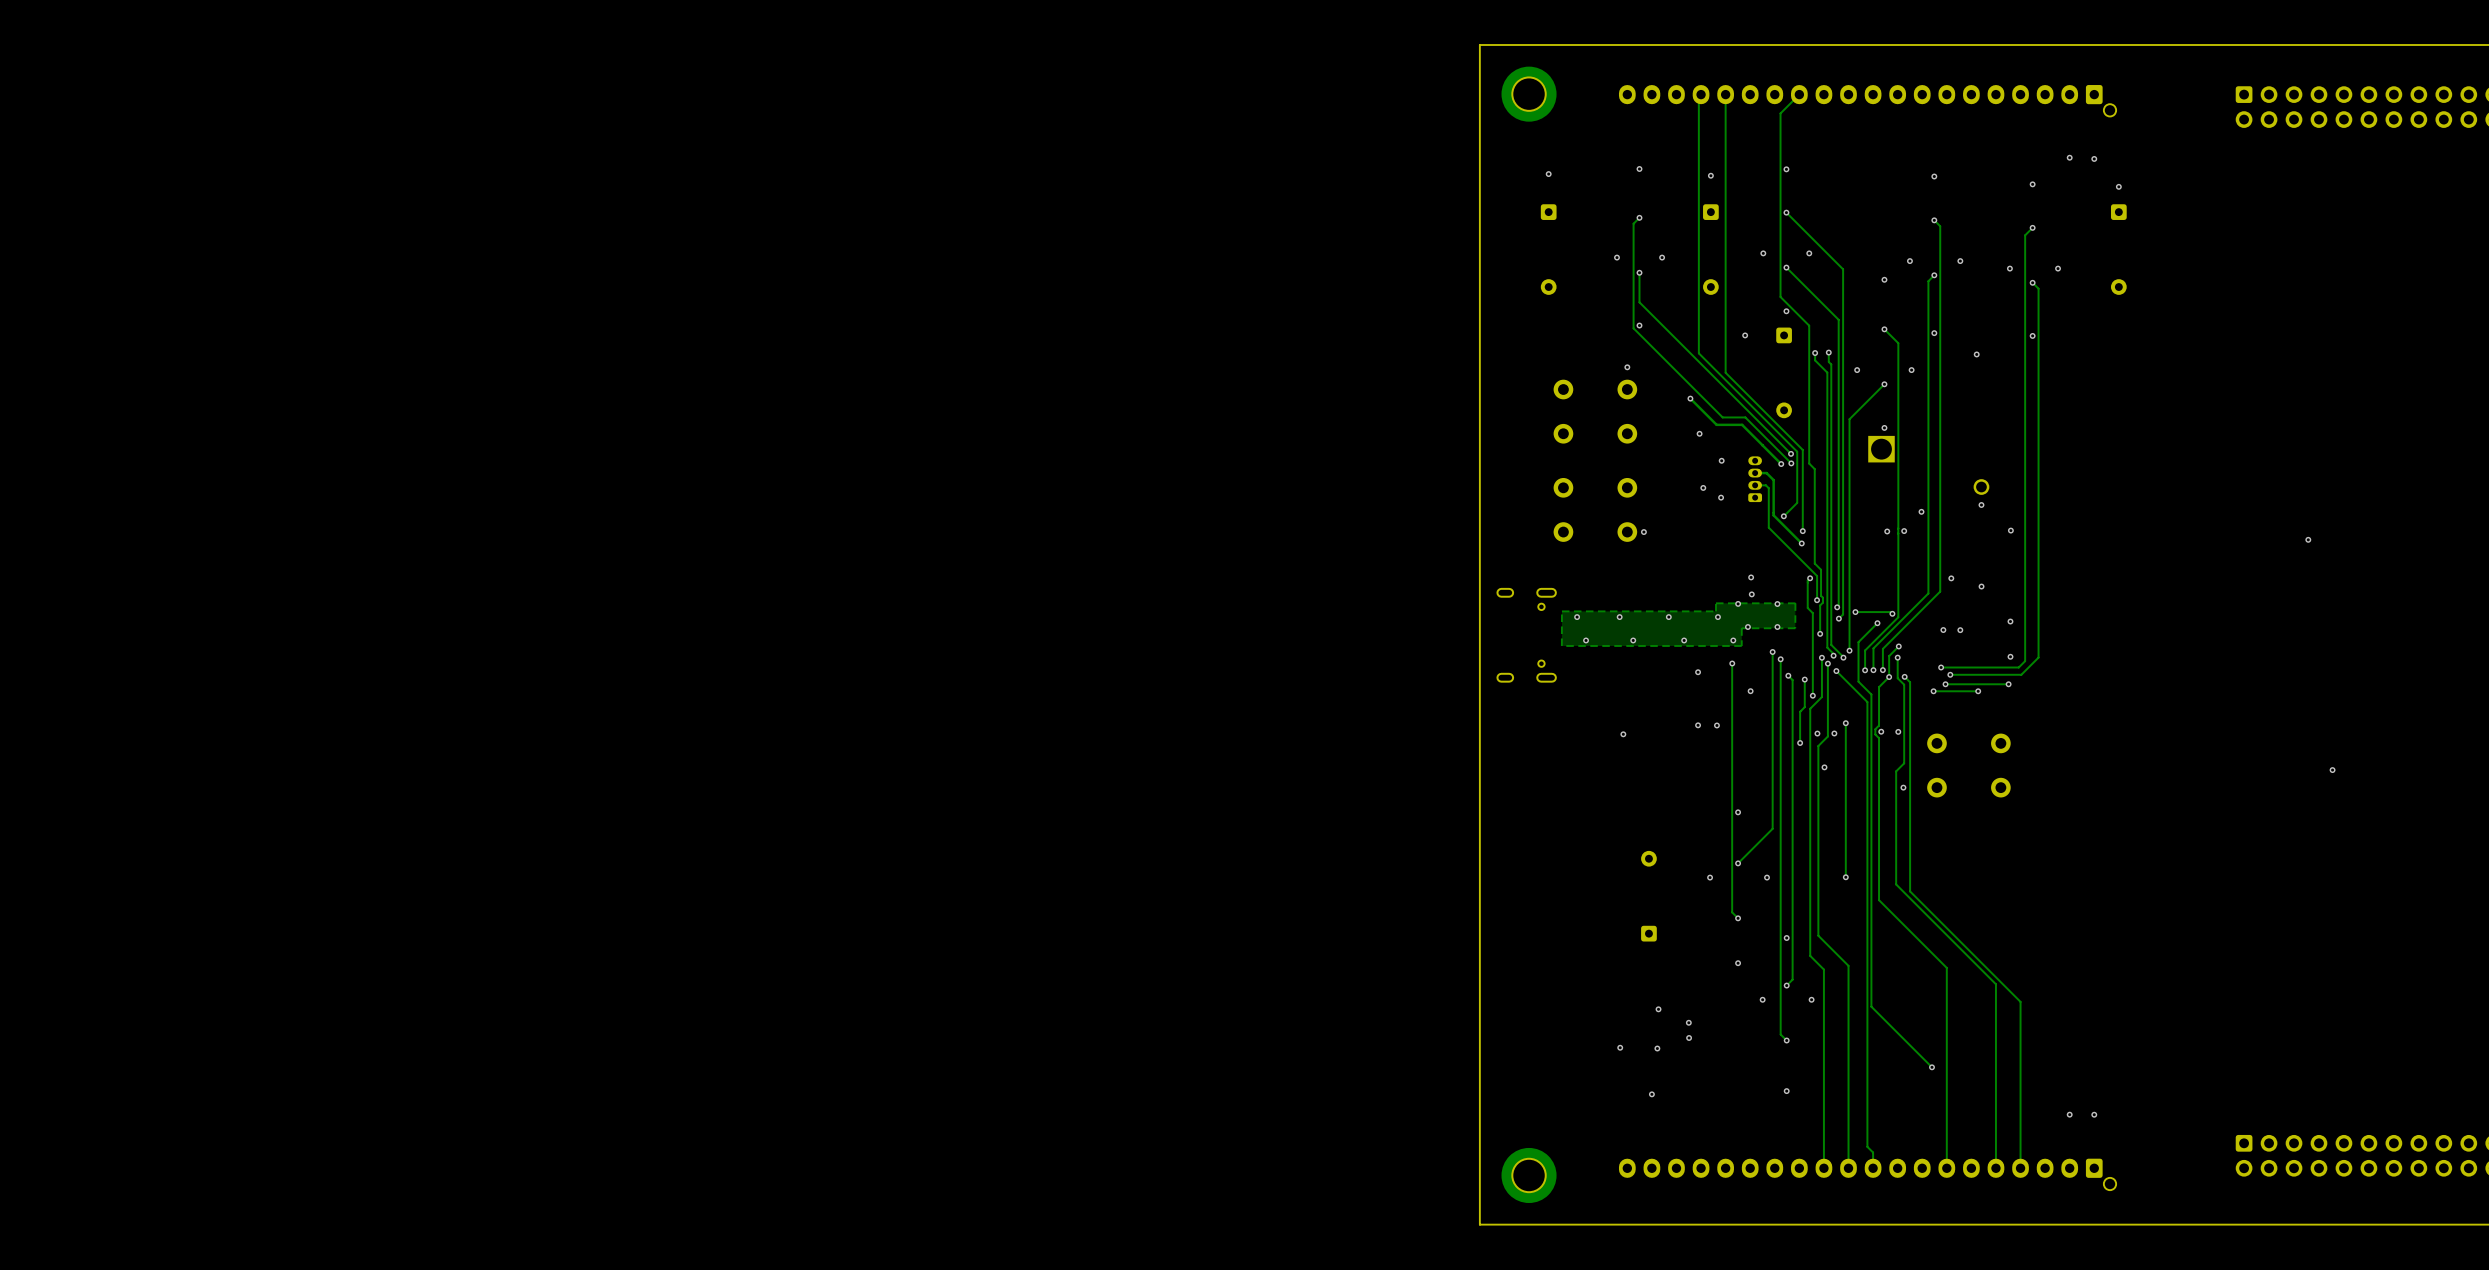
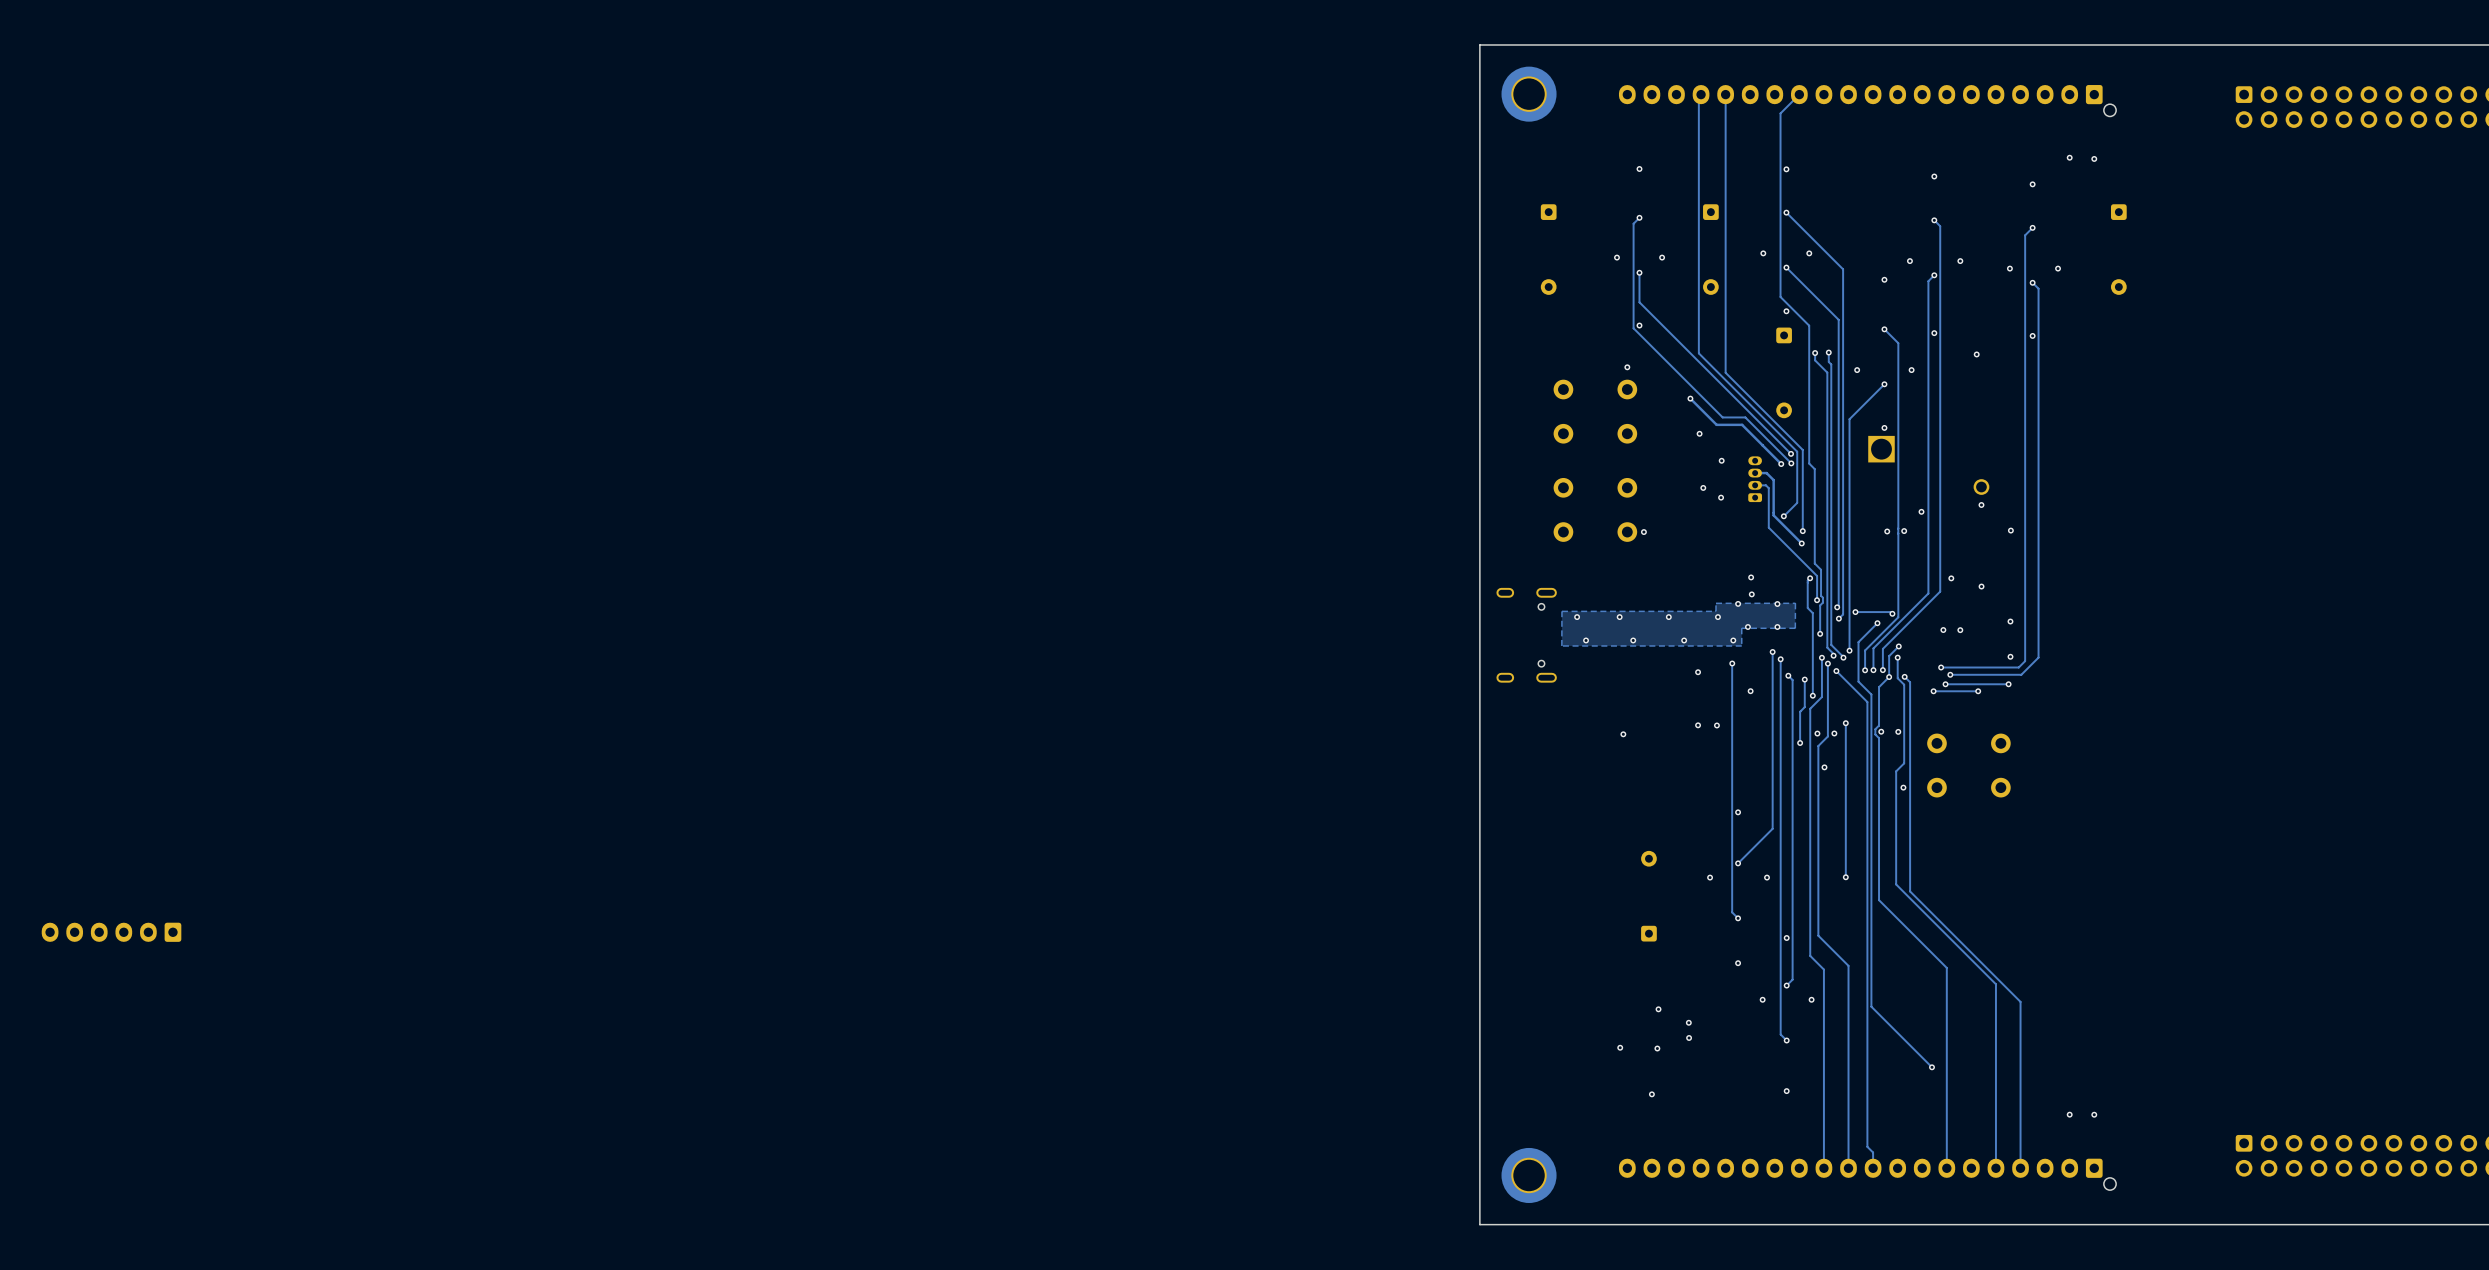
via: (1548, 174) -> none
via: (1710, 175) -> none
via: (2118, 186) -> none
via: (1745, 335) -> none
via: (2308, 539) -> none
via: (2332, 770) -> none
part: none -> (111, 932)

